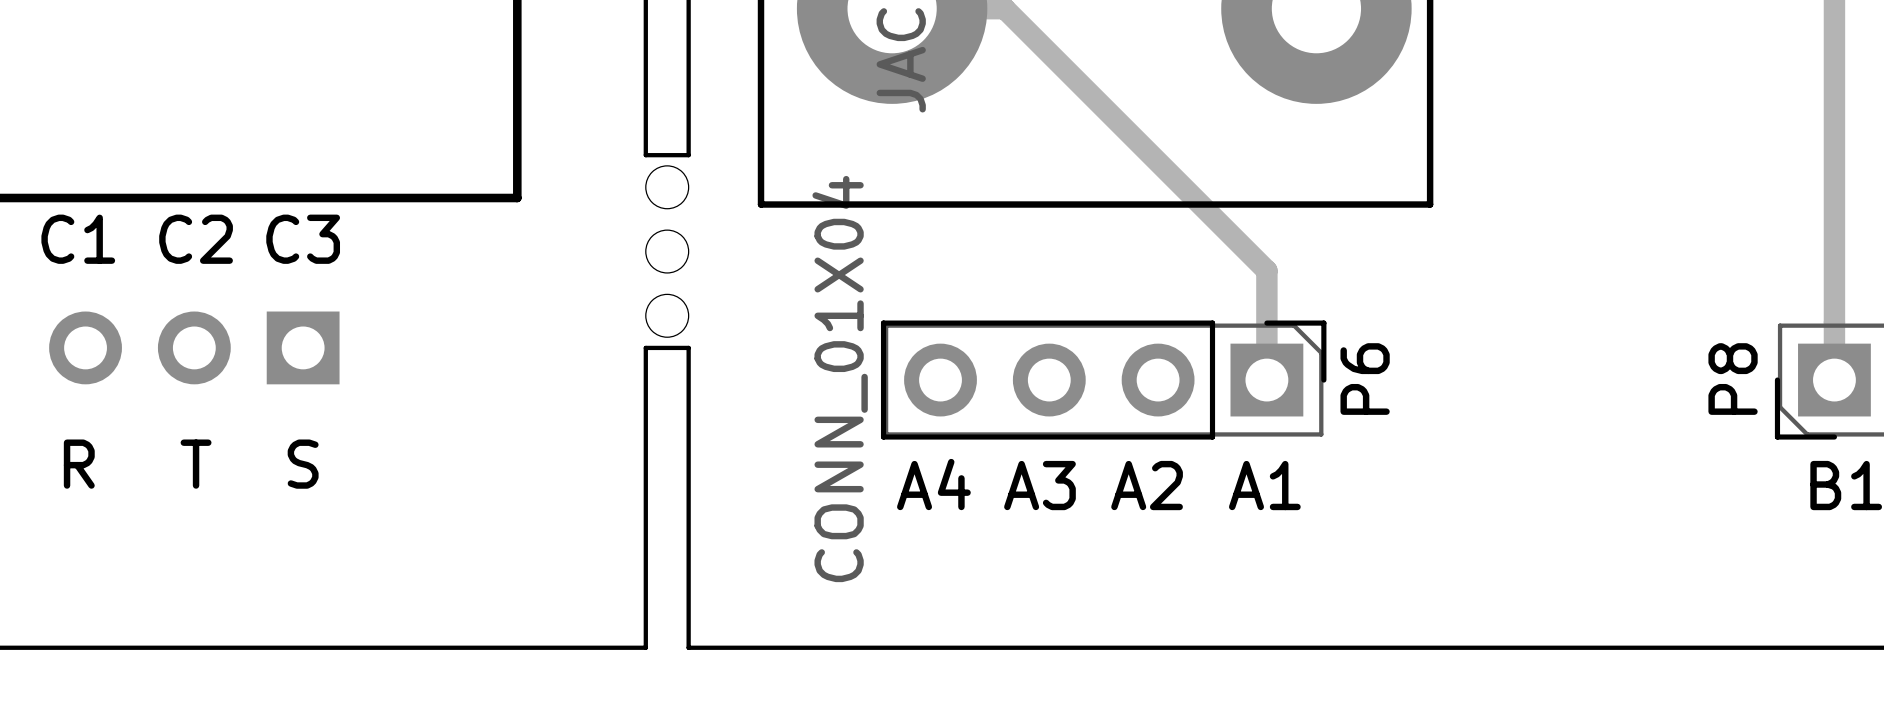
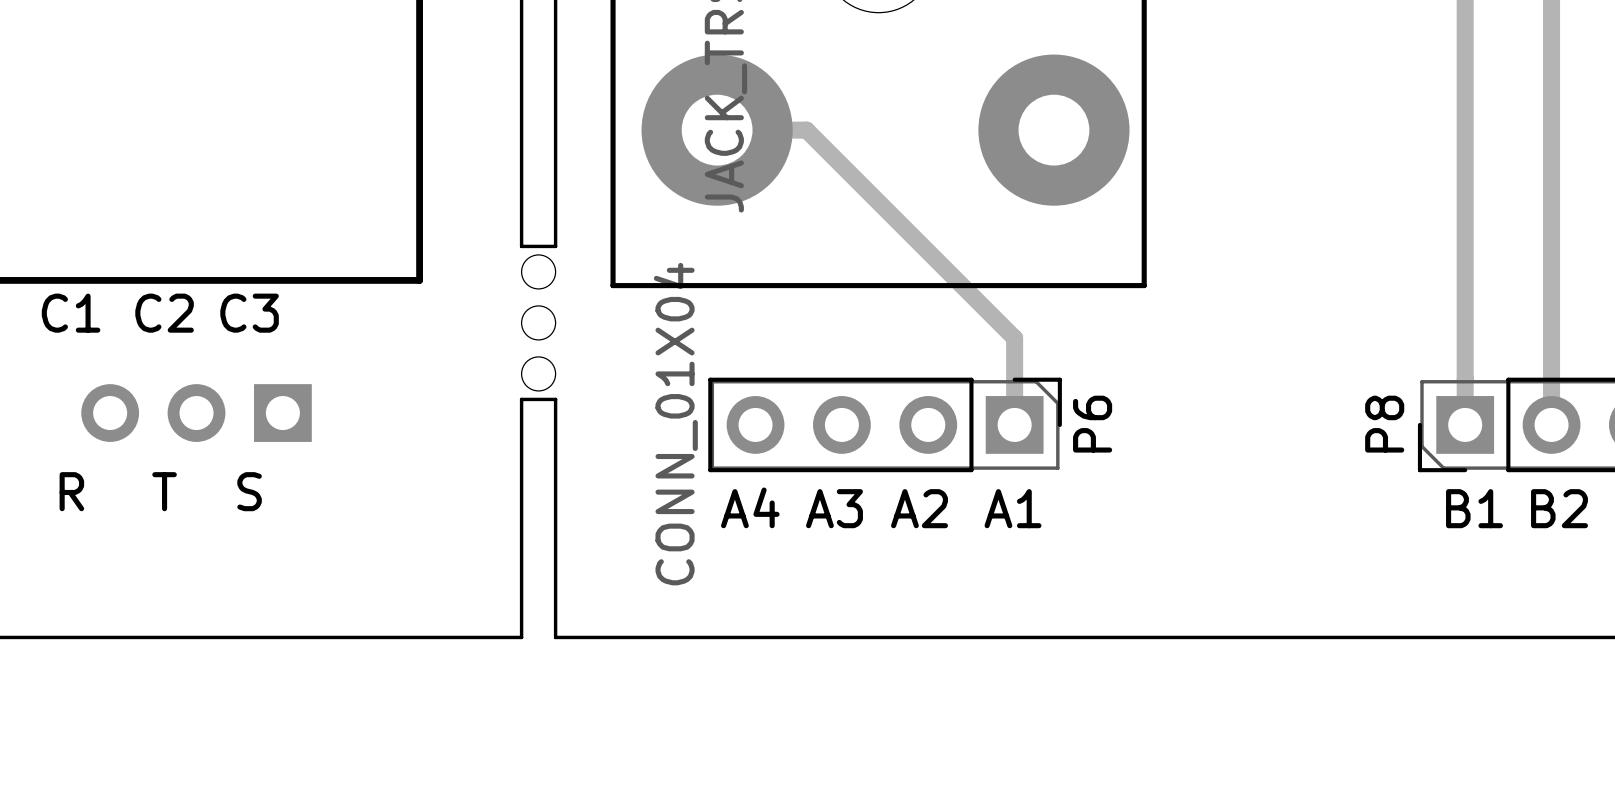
part position: (194, 347) -> (196, 413)

